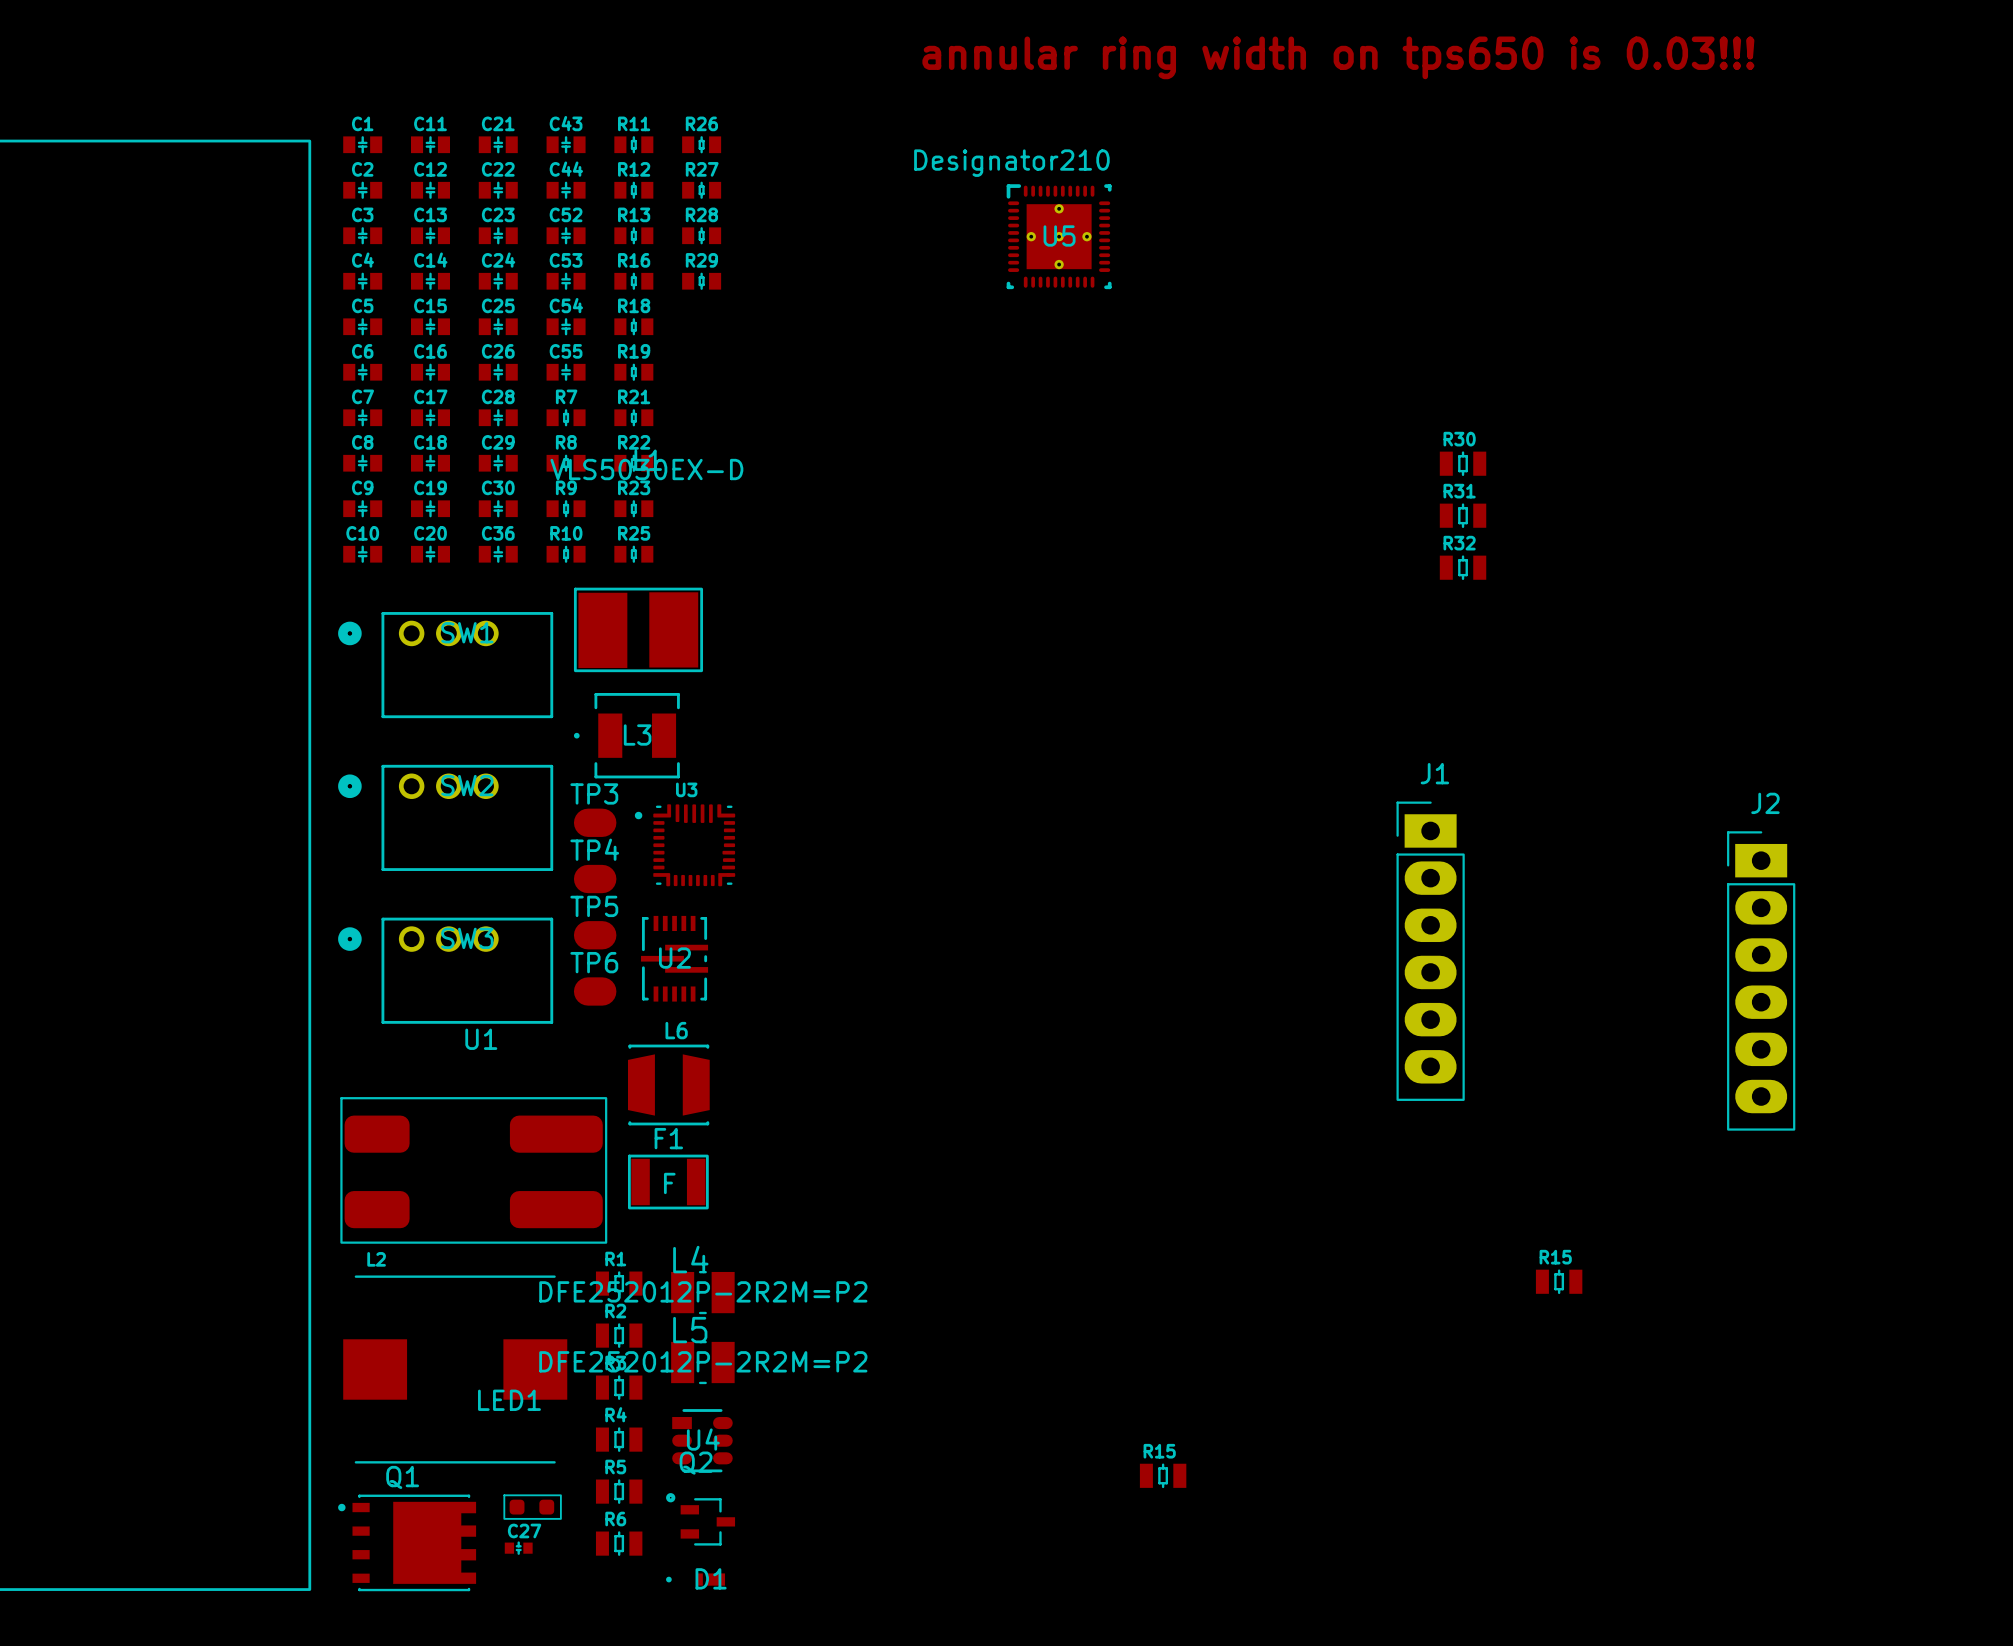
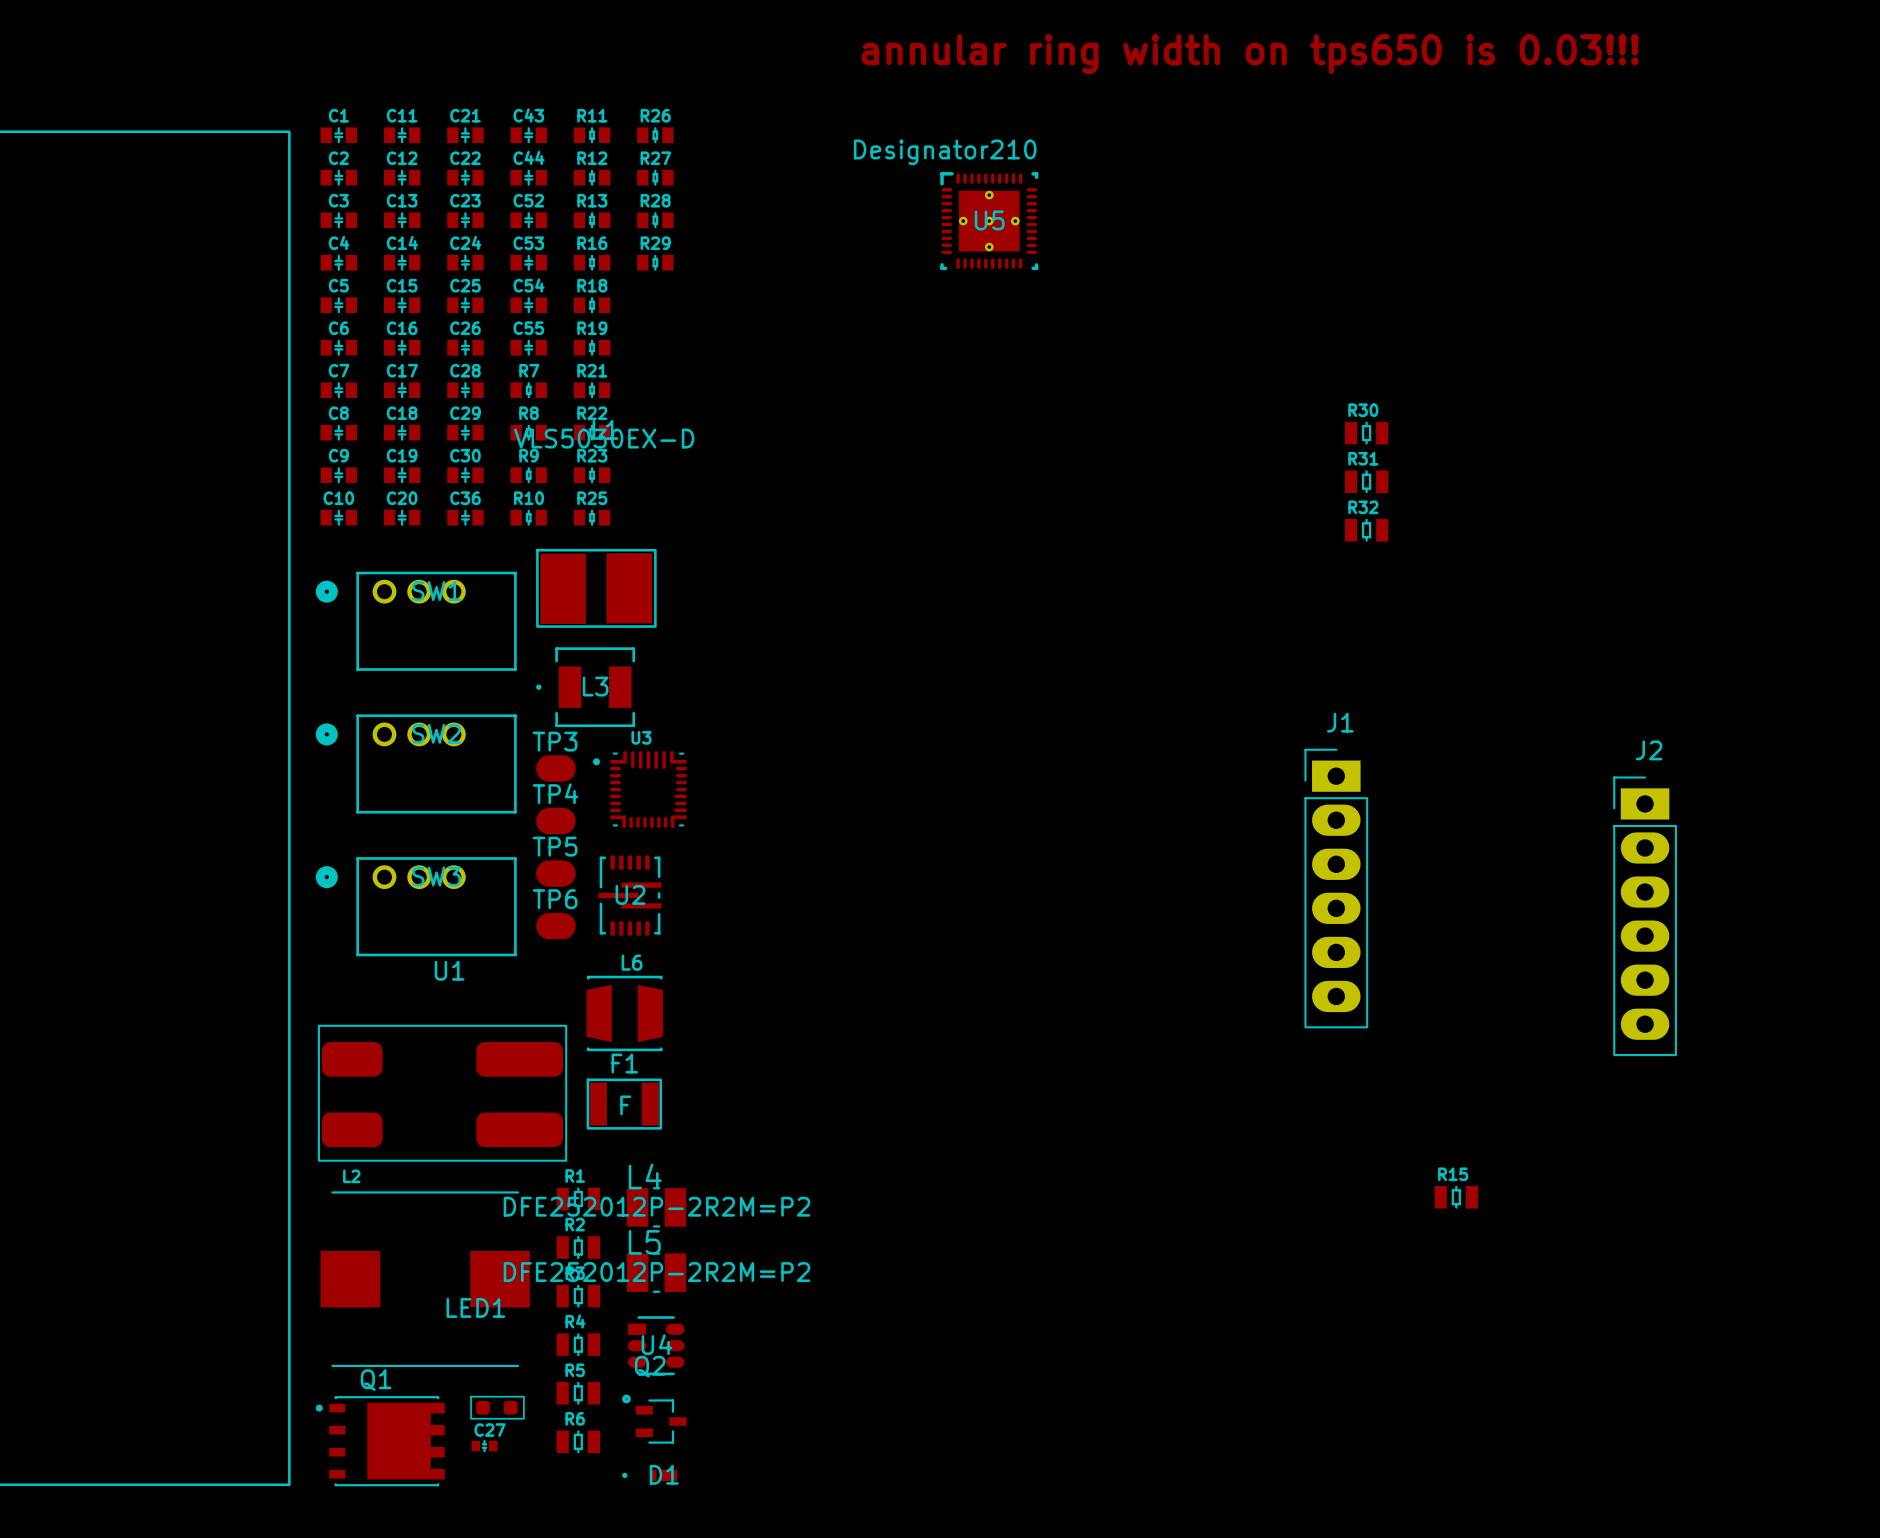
R15: (1163, 1475) -> none

